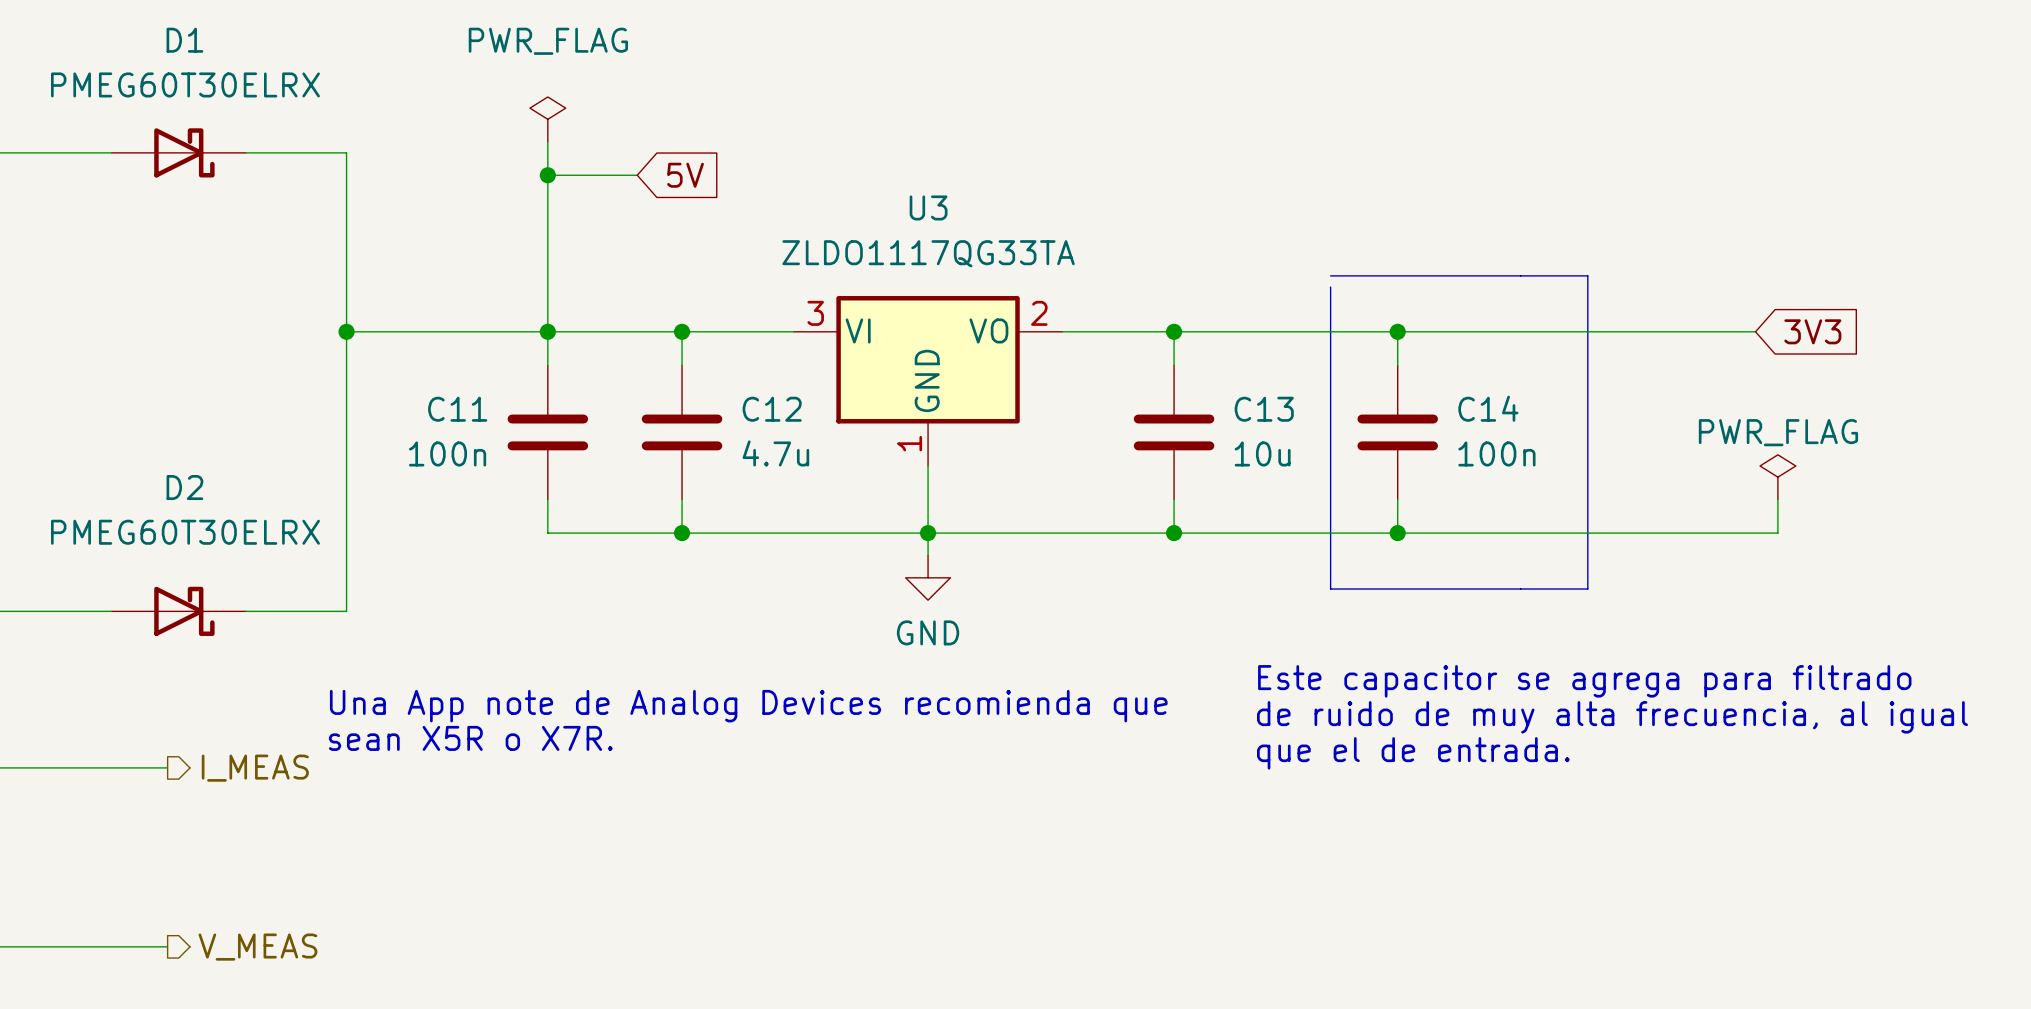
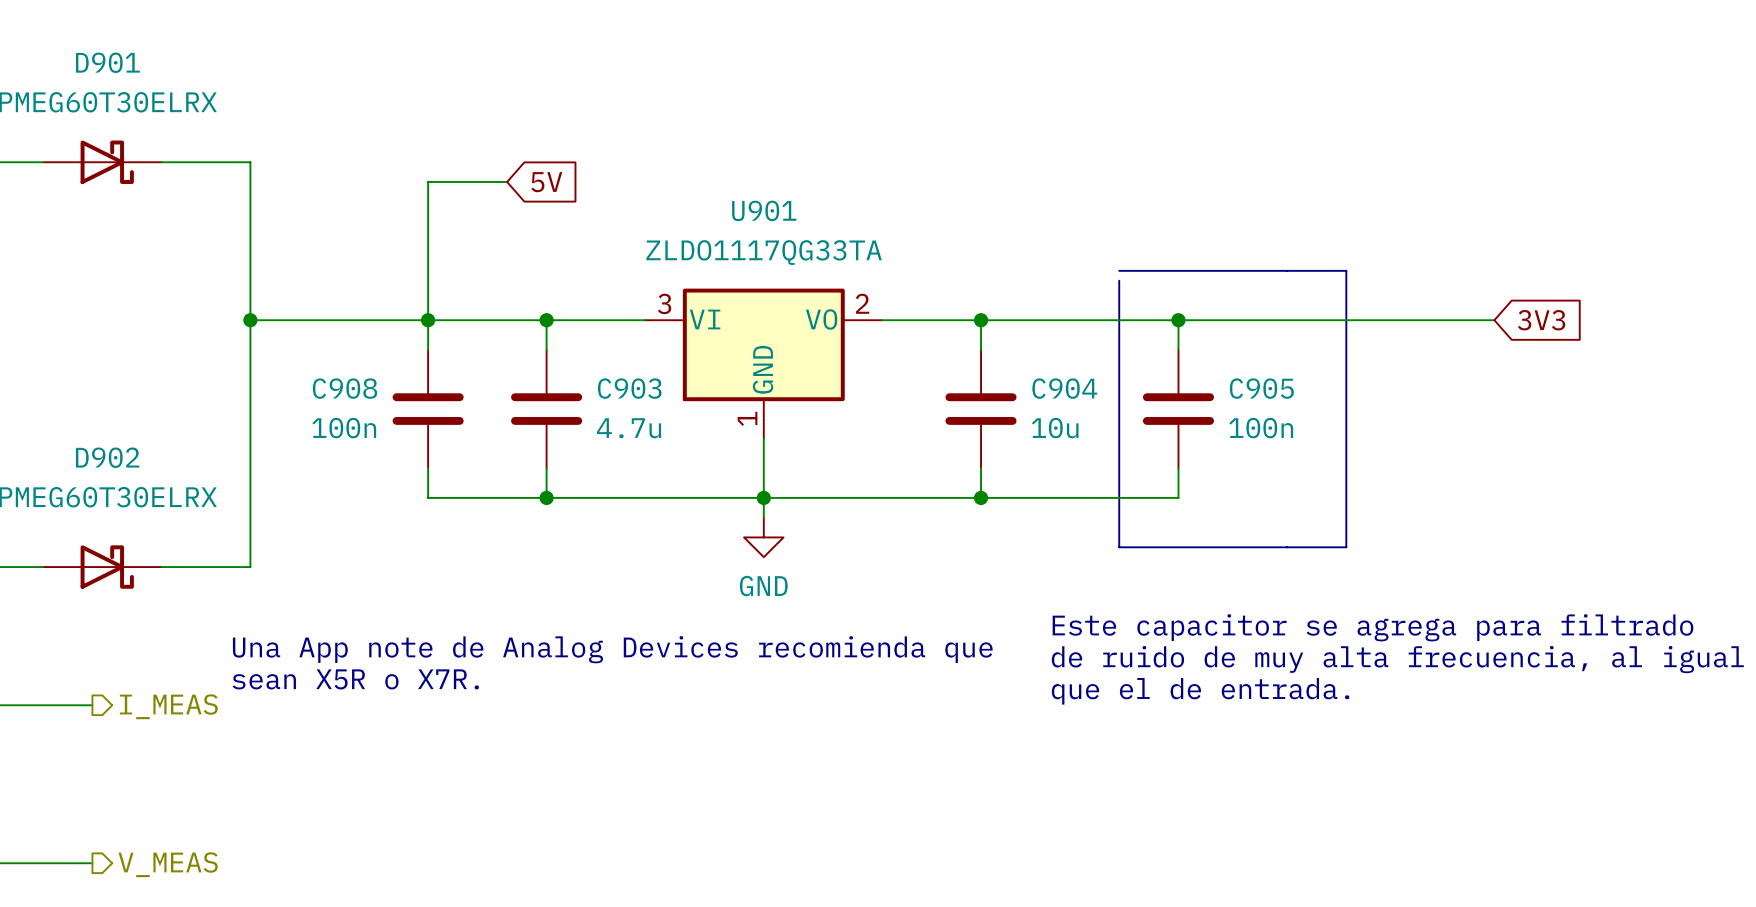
D1 name: D1 (184, 40) -> D901 (107, 62)
power symbol: PWR_FLAG (547, 119) -> none
wire: (547, 141) (547, 175) -> none
junction: (547, 175) -> none
U3 name: U3 (928, 207) -> U901 (764, 210)
C14 name: C14 (1488, 408) -> C905 (1261, 388)
C11 name: C11 (457, 409) -> C908 (345, 388)
C12 name: C12 (772, 409) -> C903 (629, 388)
C13 name: C13 (1264, 409) -> C904 (1064, 388)
power symbol: PWR_FLAG (1777, 477) -> none
D2 name: D2 (184, 487) -> D902 (107, 457)
wire: (1777, 499) (1777, 533) (1397, 533) -> none
junction: (1397, 533) -> none

